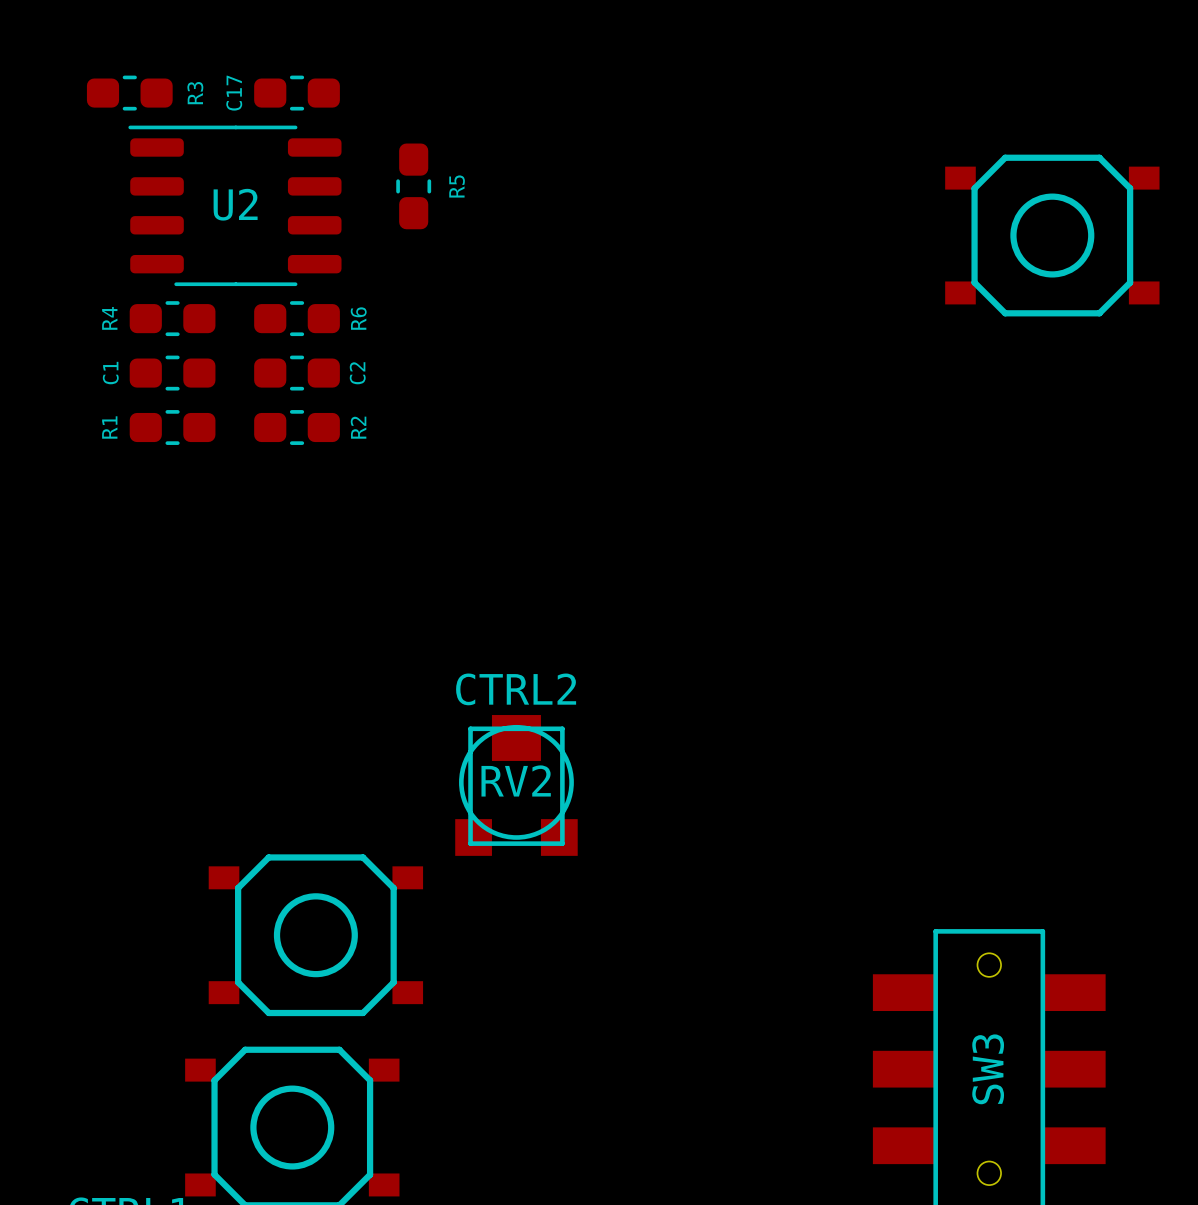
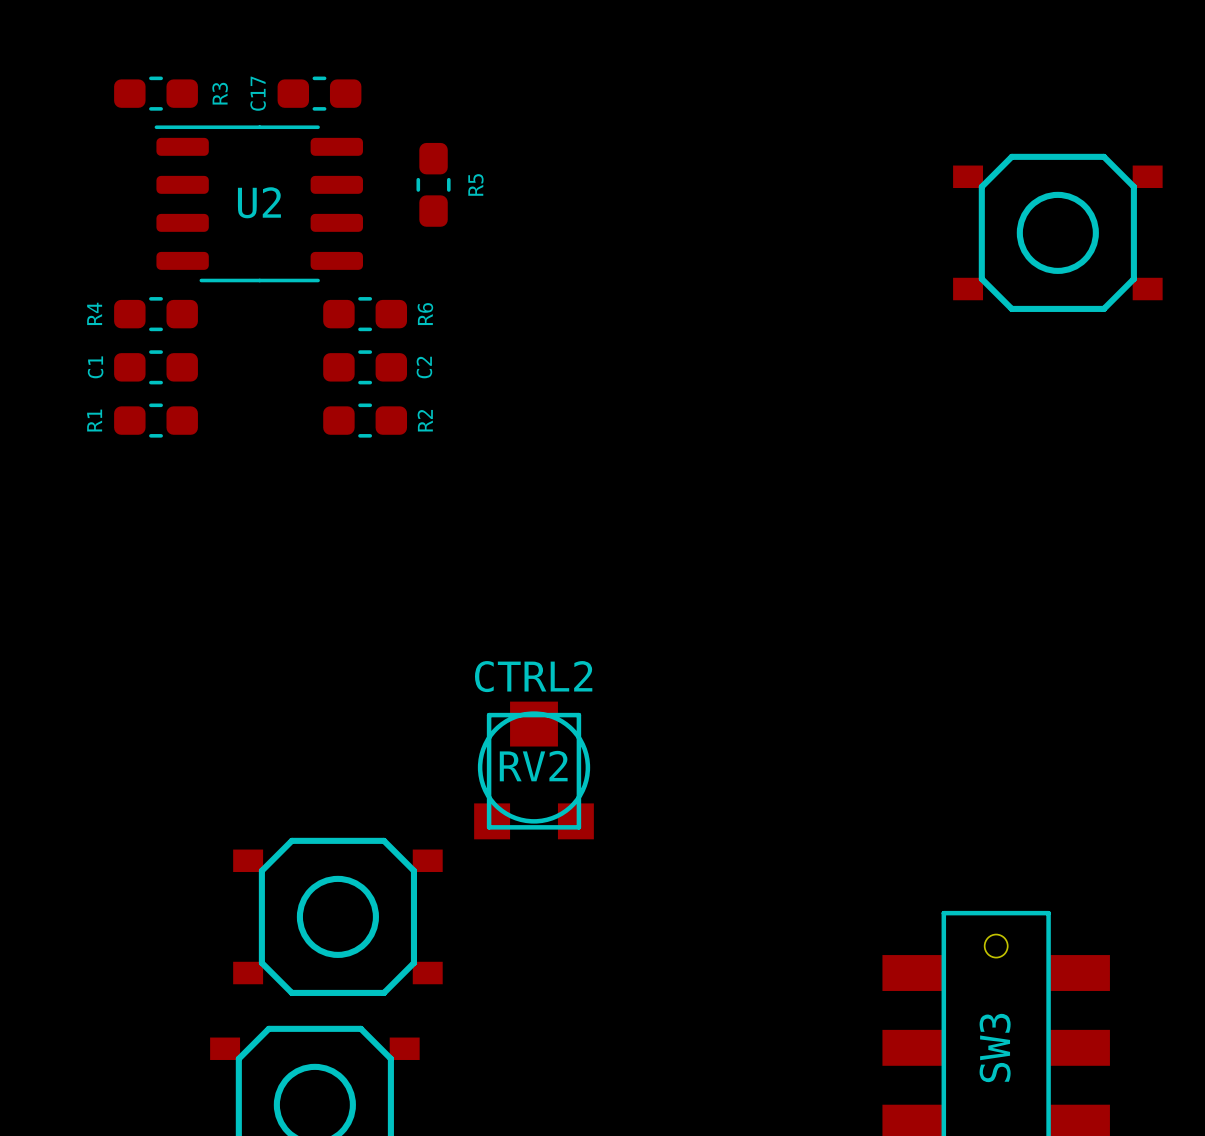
R4 position: (172, 318) -> (156, 314)
R6 position: (297, 318) -> (365, 314)
C1 position: (172, 373) -> (156, 367)
C2 position: (297, 373) -> (365, 367)
R1 position: (172, 427) -> (156, 420)
R2 position: (297, 427) -> (365, 420)

